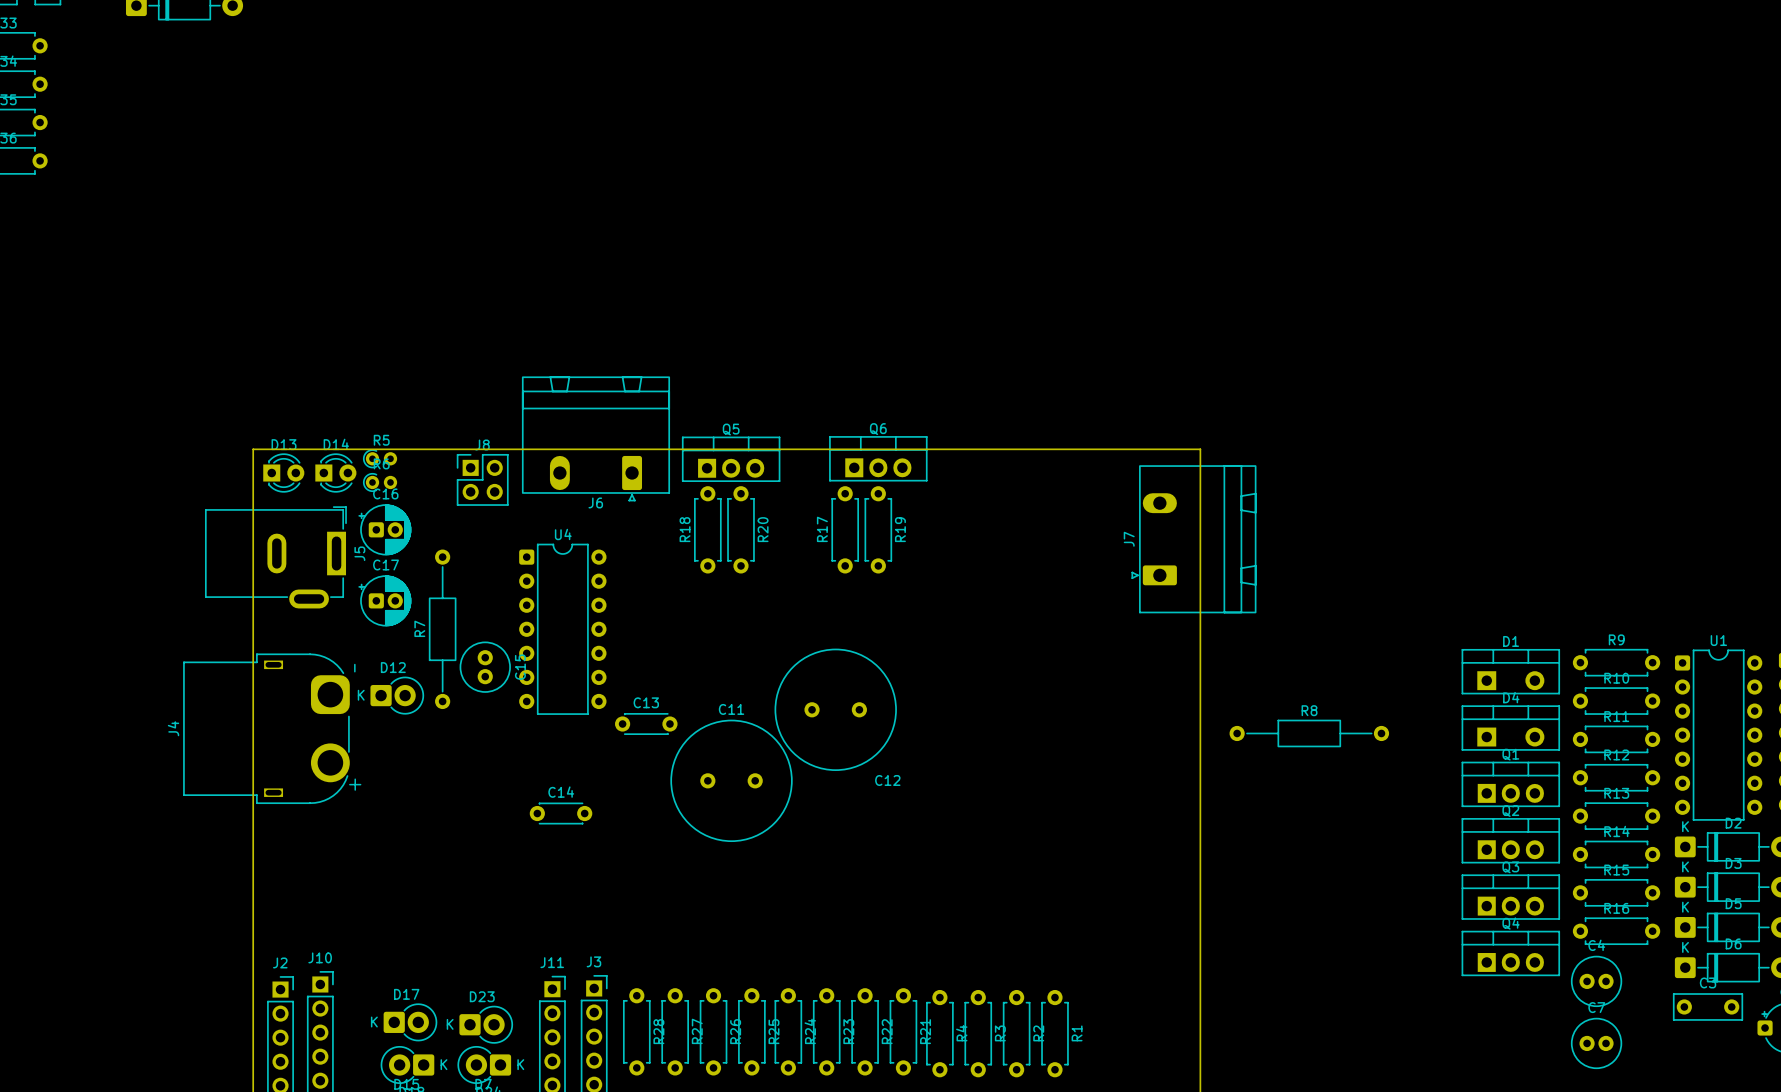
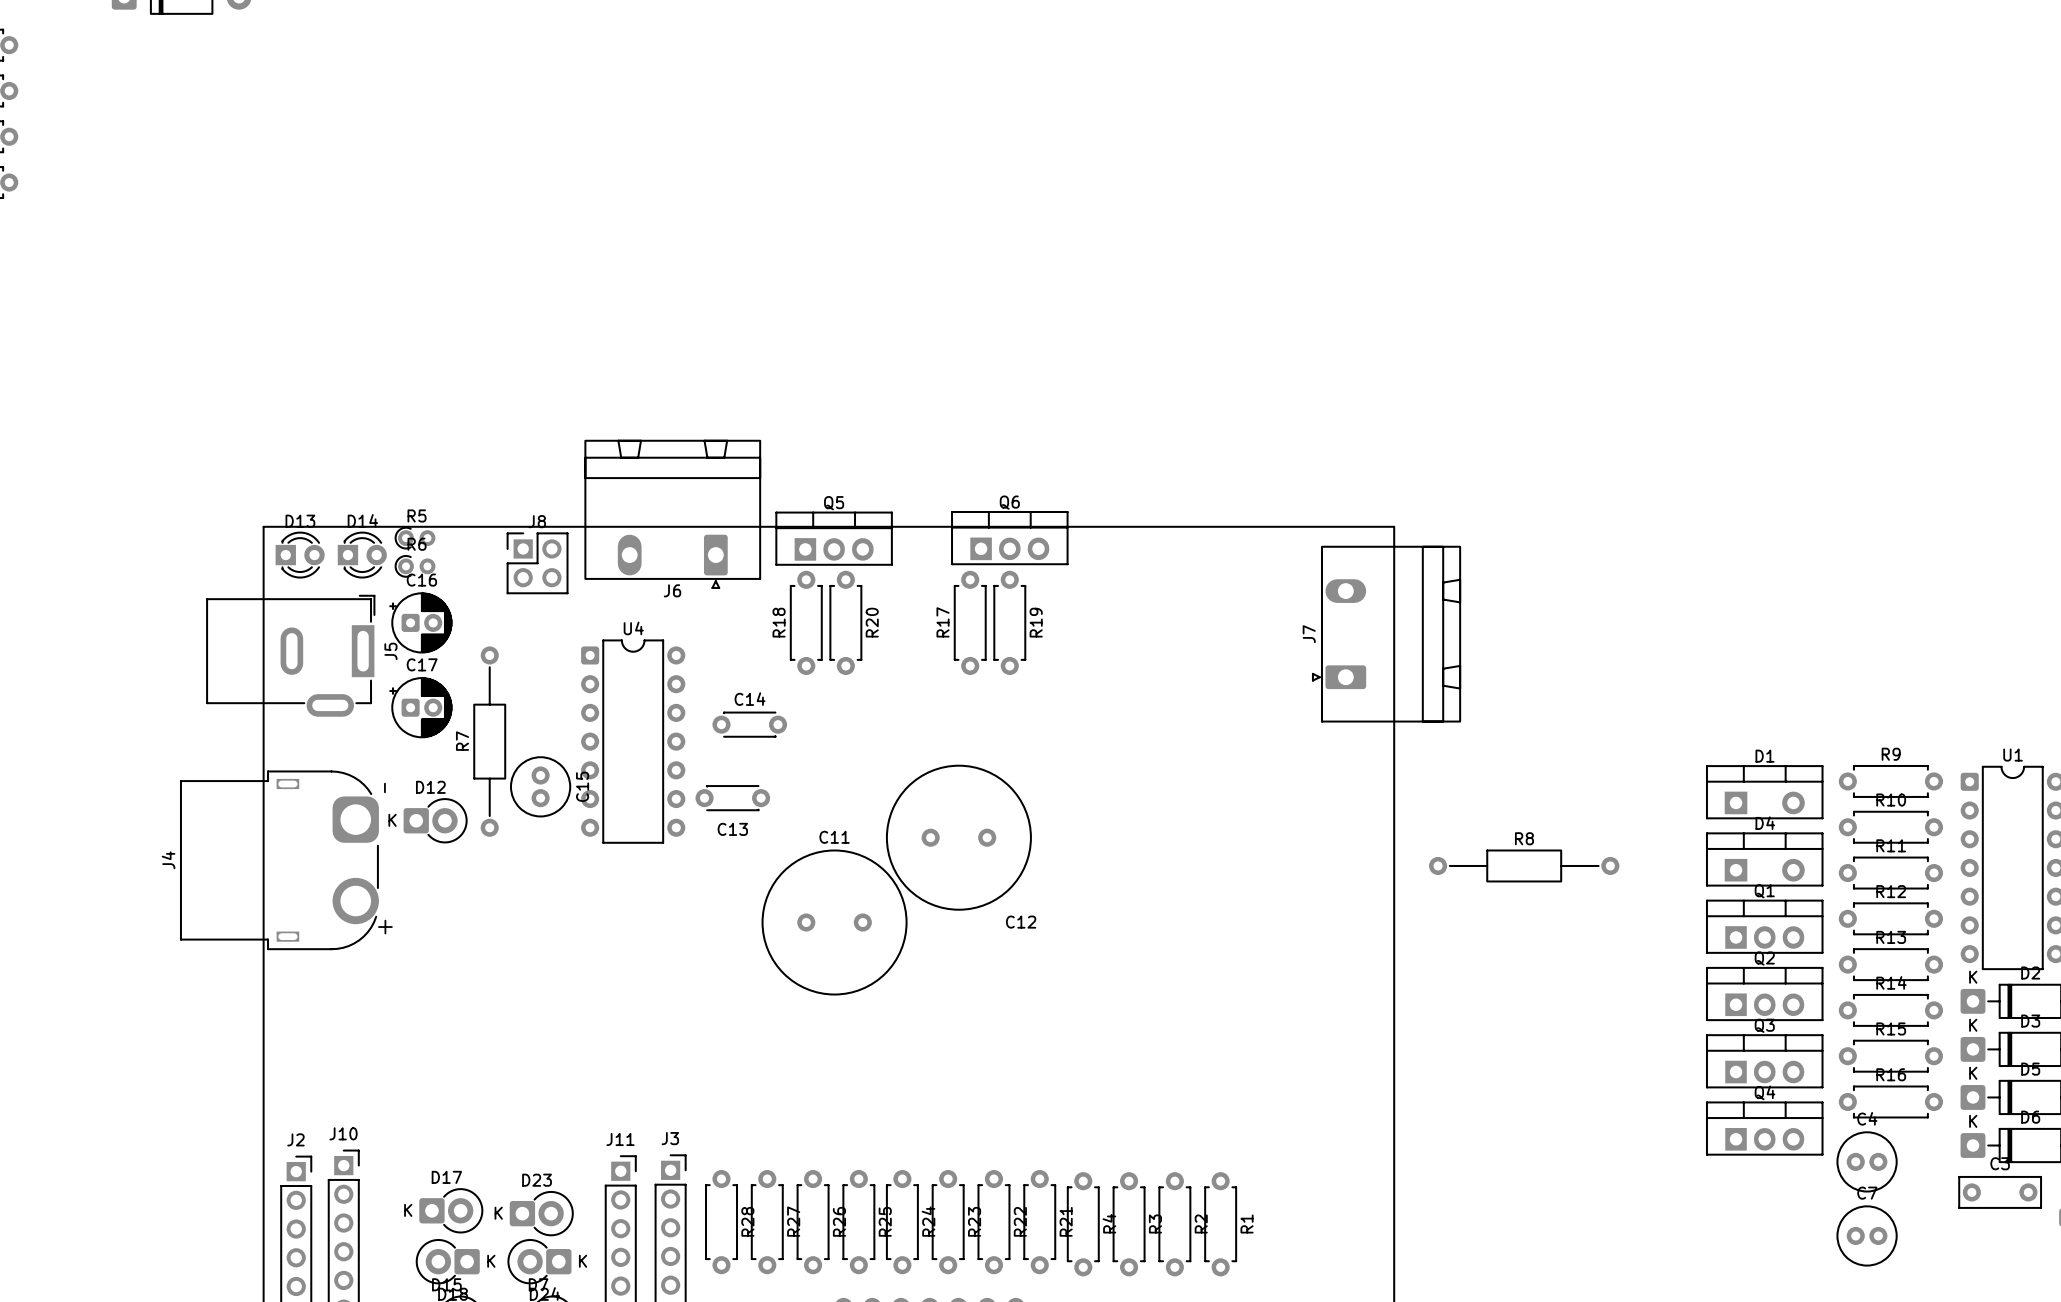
C13 position: (646, 724) -> (732, 798)
C14 position: (561, 813) -> (749, 724)

